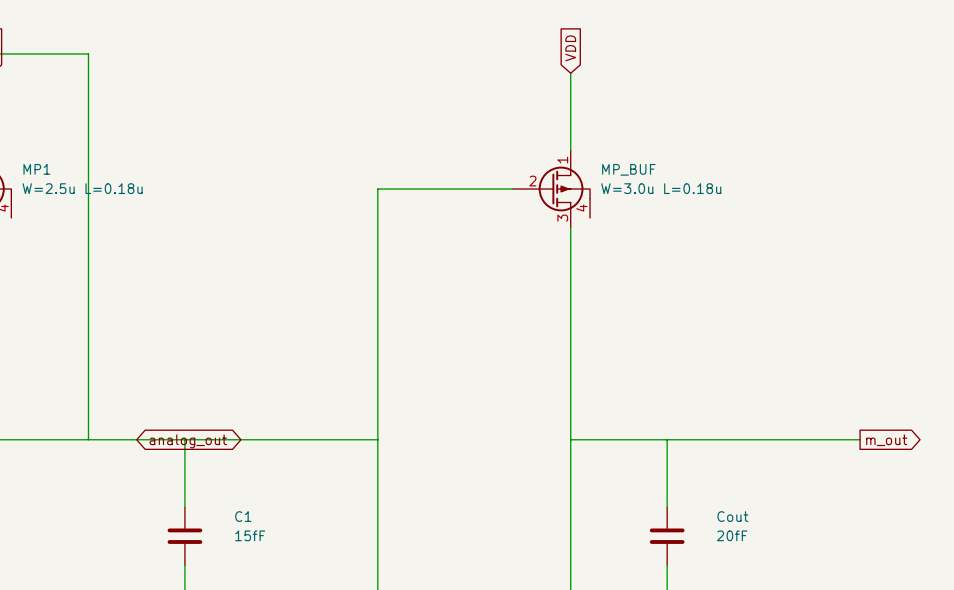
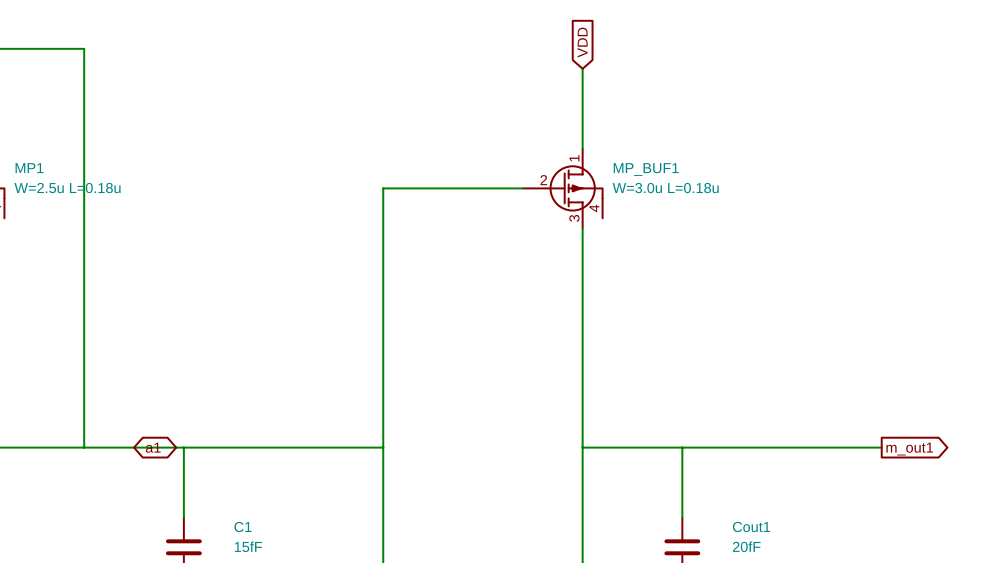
MP_BUF name: MP_BUF (628, 169) -> MP_BUF1 (646, 169)
global label: m_out (886, 440) -> m_out1 (909, 449)
global label: analog_out (188, 441) -> a1 (153, 447)
Cout name: Cout (732, 516) -> Cout1 (751, 526)

